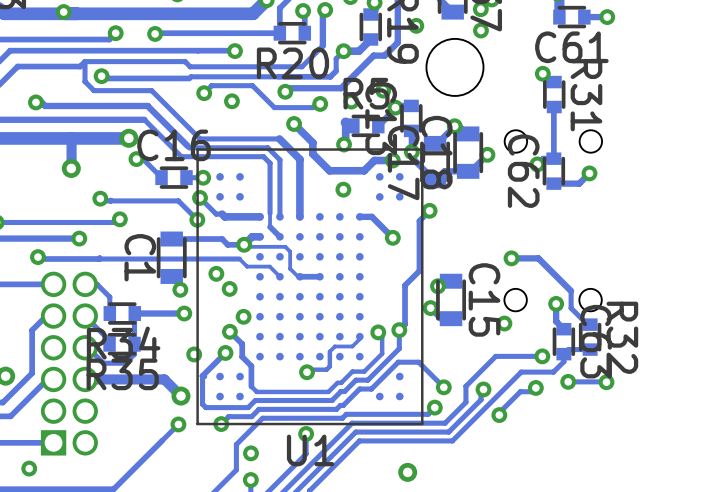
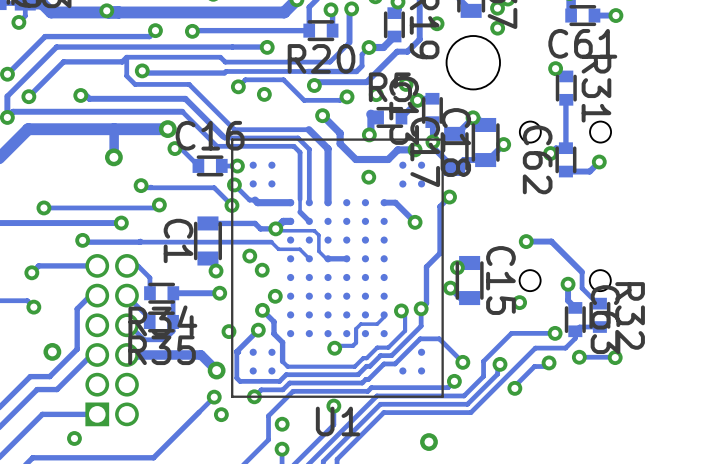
via: none -> (221, 414)

